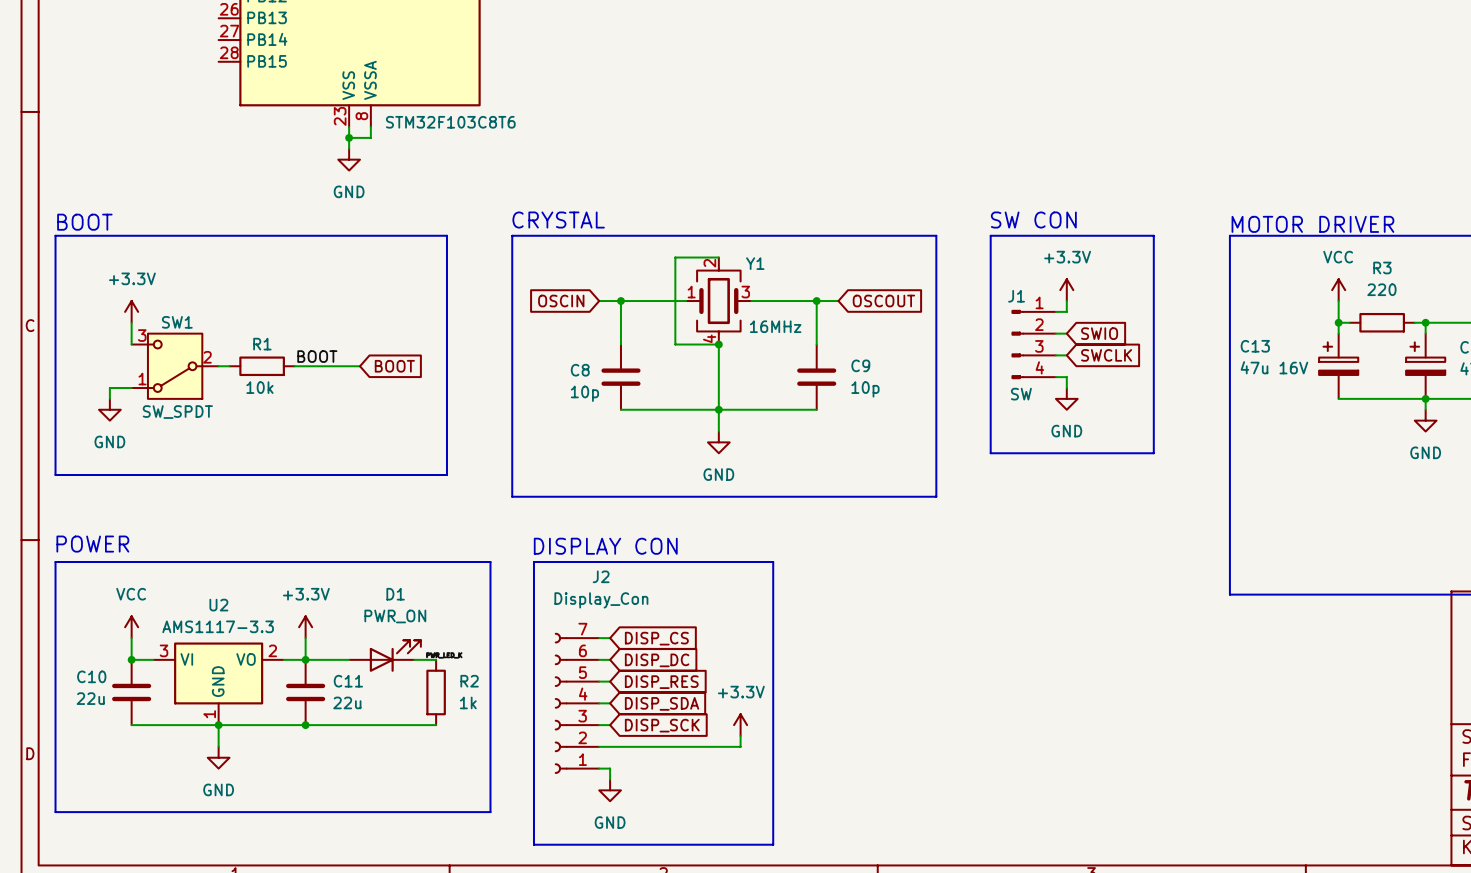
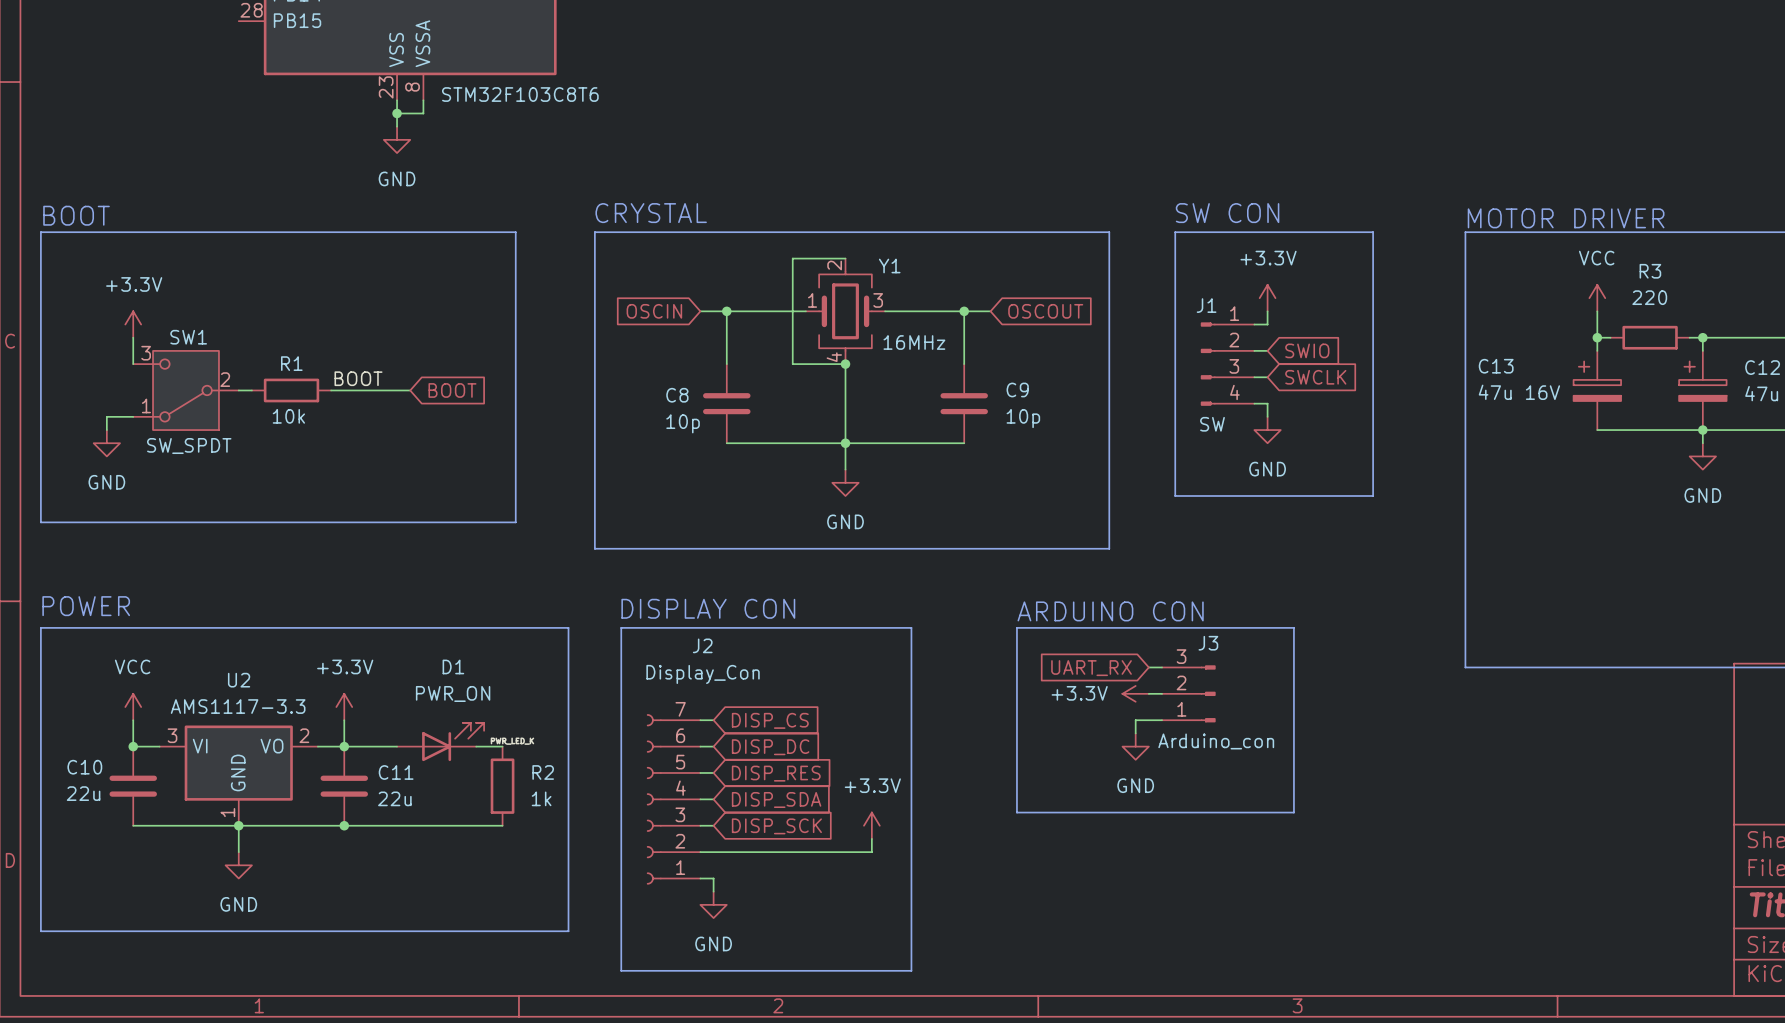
text: none -> ARDUINO CON (1110, 611)
line: none -> (1016, 627) (1293, 627) (1293, 812) (1016, 812) (1016, 627)
wire: none -> (1148, 667) (1162, 667)
global label: none -> UART_RX (1091, 668)
power symbol: none -> +3.3V (1135, 693)
wire: none -> (1148, 693) (1162, 693)
J3: none -> Arduino_con (1188, 693)
wire: none -> (1162, 720) (1135, 720) (1135, 733)
power symbol: none -> GND (1135, 746)

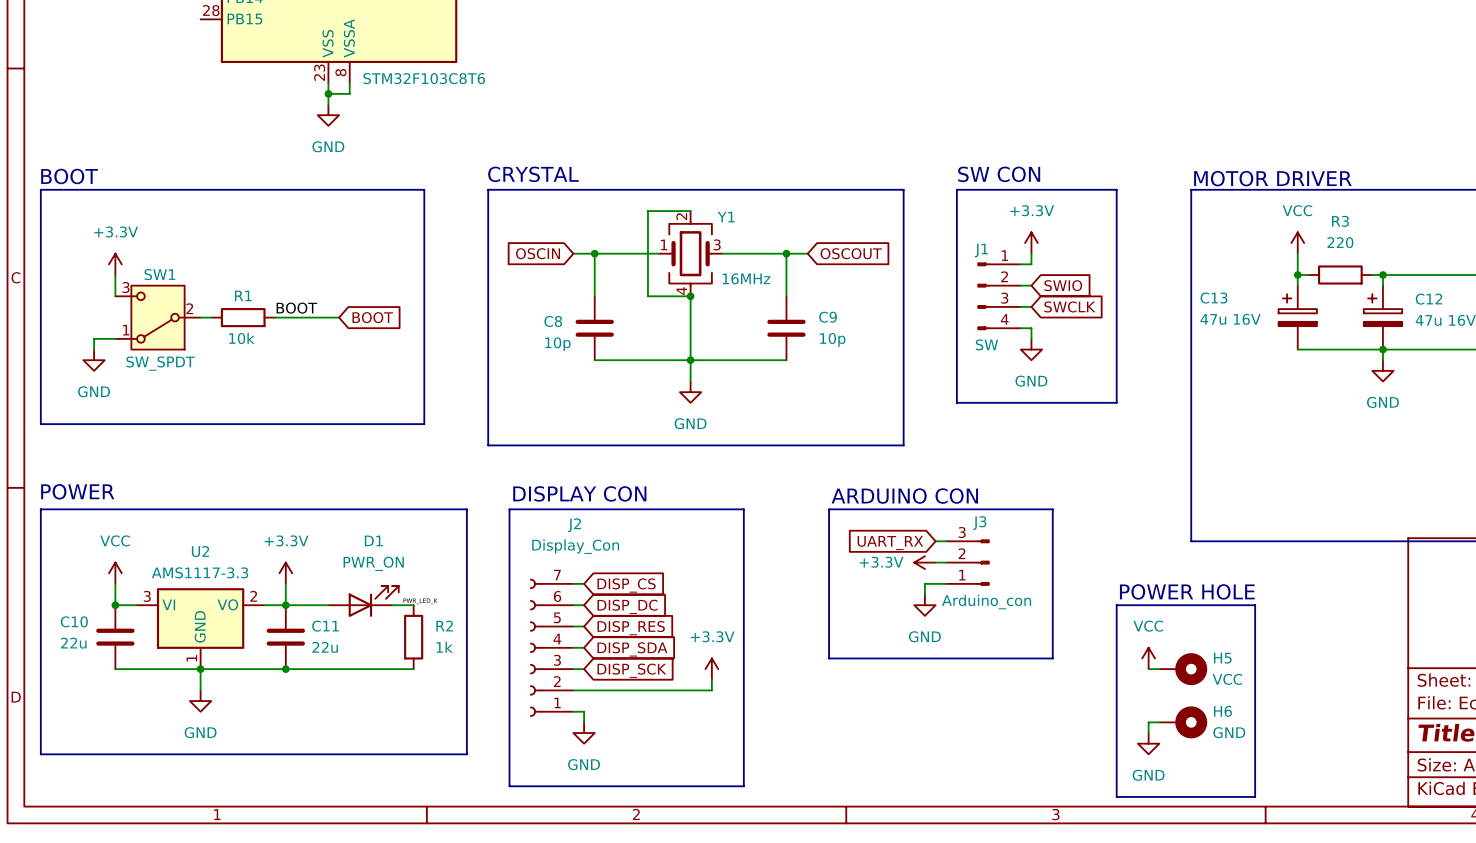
text: none -> POWER HOLE (1187, 591)
line: none -> (1116, 605) (1255, 605) (1255, 796) (1116, 796) (1116, 605)
power symbol: none -> VCC (1148, 658)
wire: none -> (1148, 669) (1159, 669)
H5: none -> VCC (1183, 669)
wire: none -> (1159, 722) (1148, 722) (1148, 733)
H6: none -> GND (1183, 722)
power symbol: none -> GND (1148, 743)

